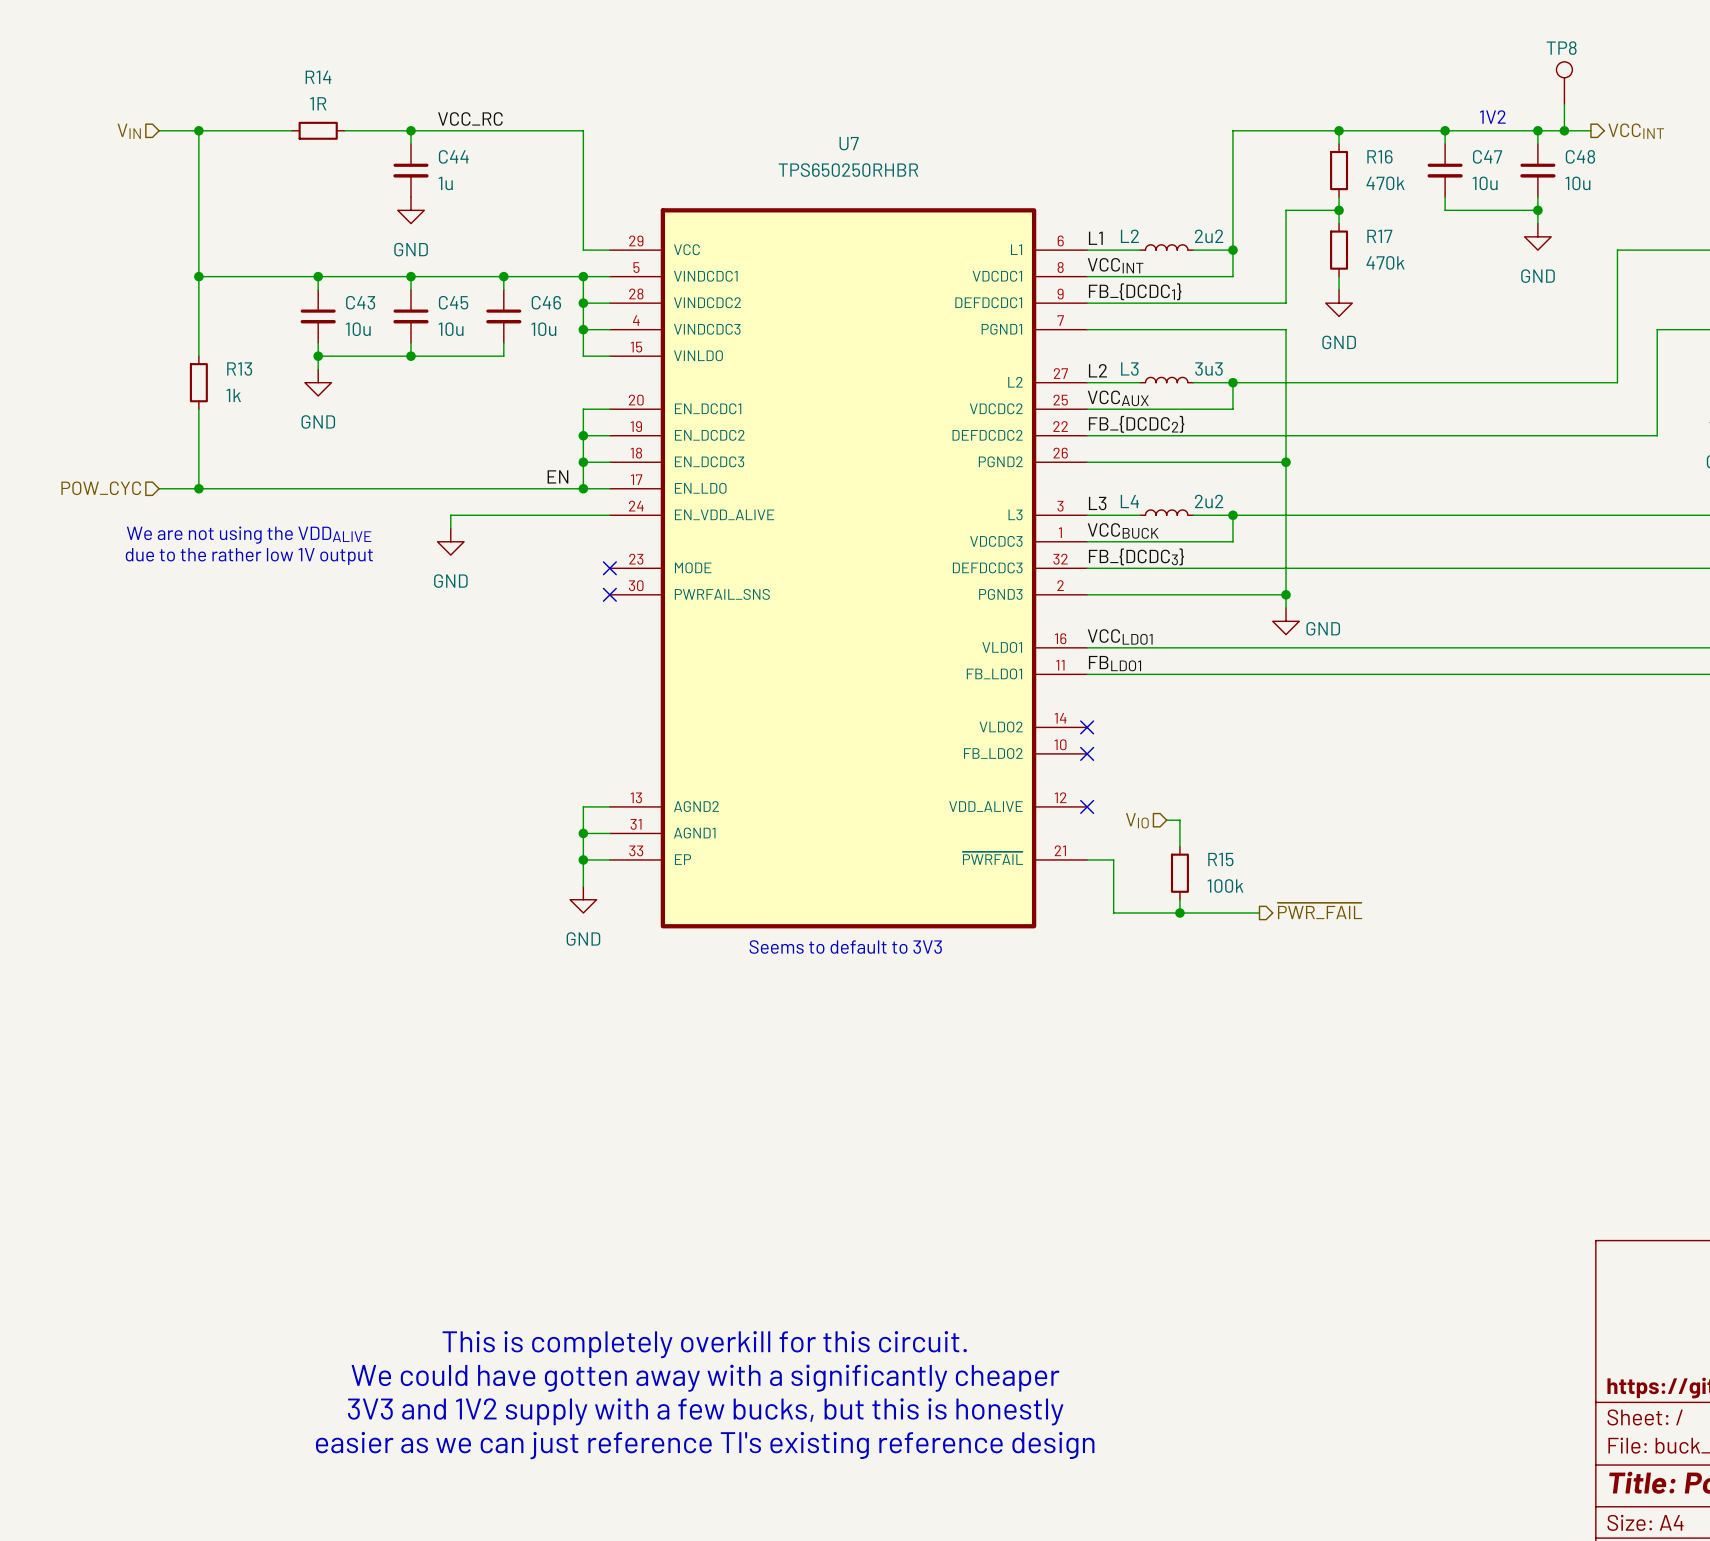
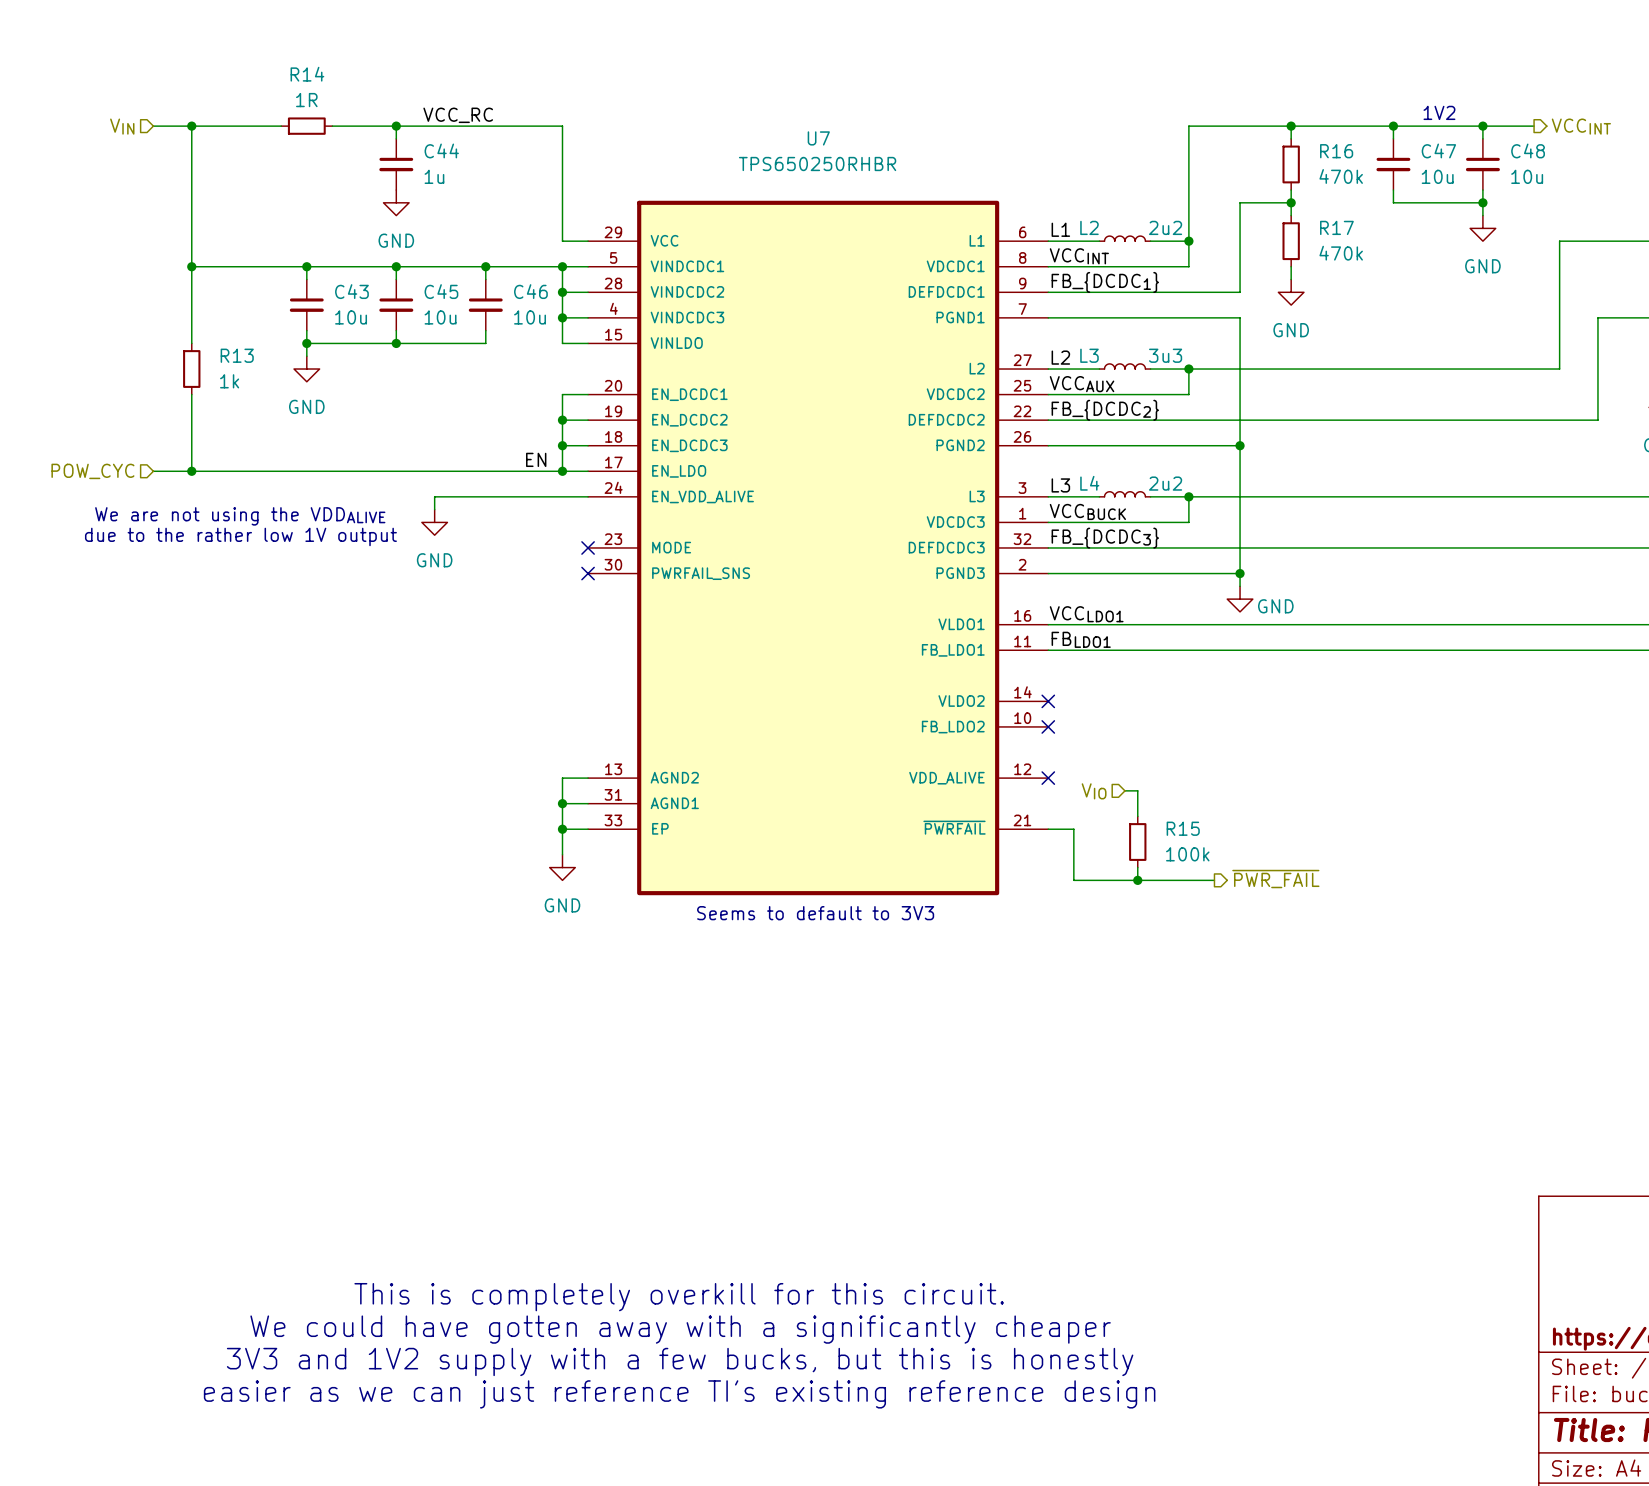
TP8: (1564, 83) -> none
wire: (1564, 104) (1564, 130) -> none
junction: (1564, 130) -> none

